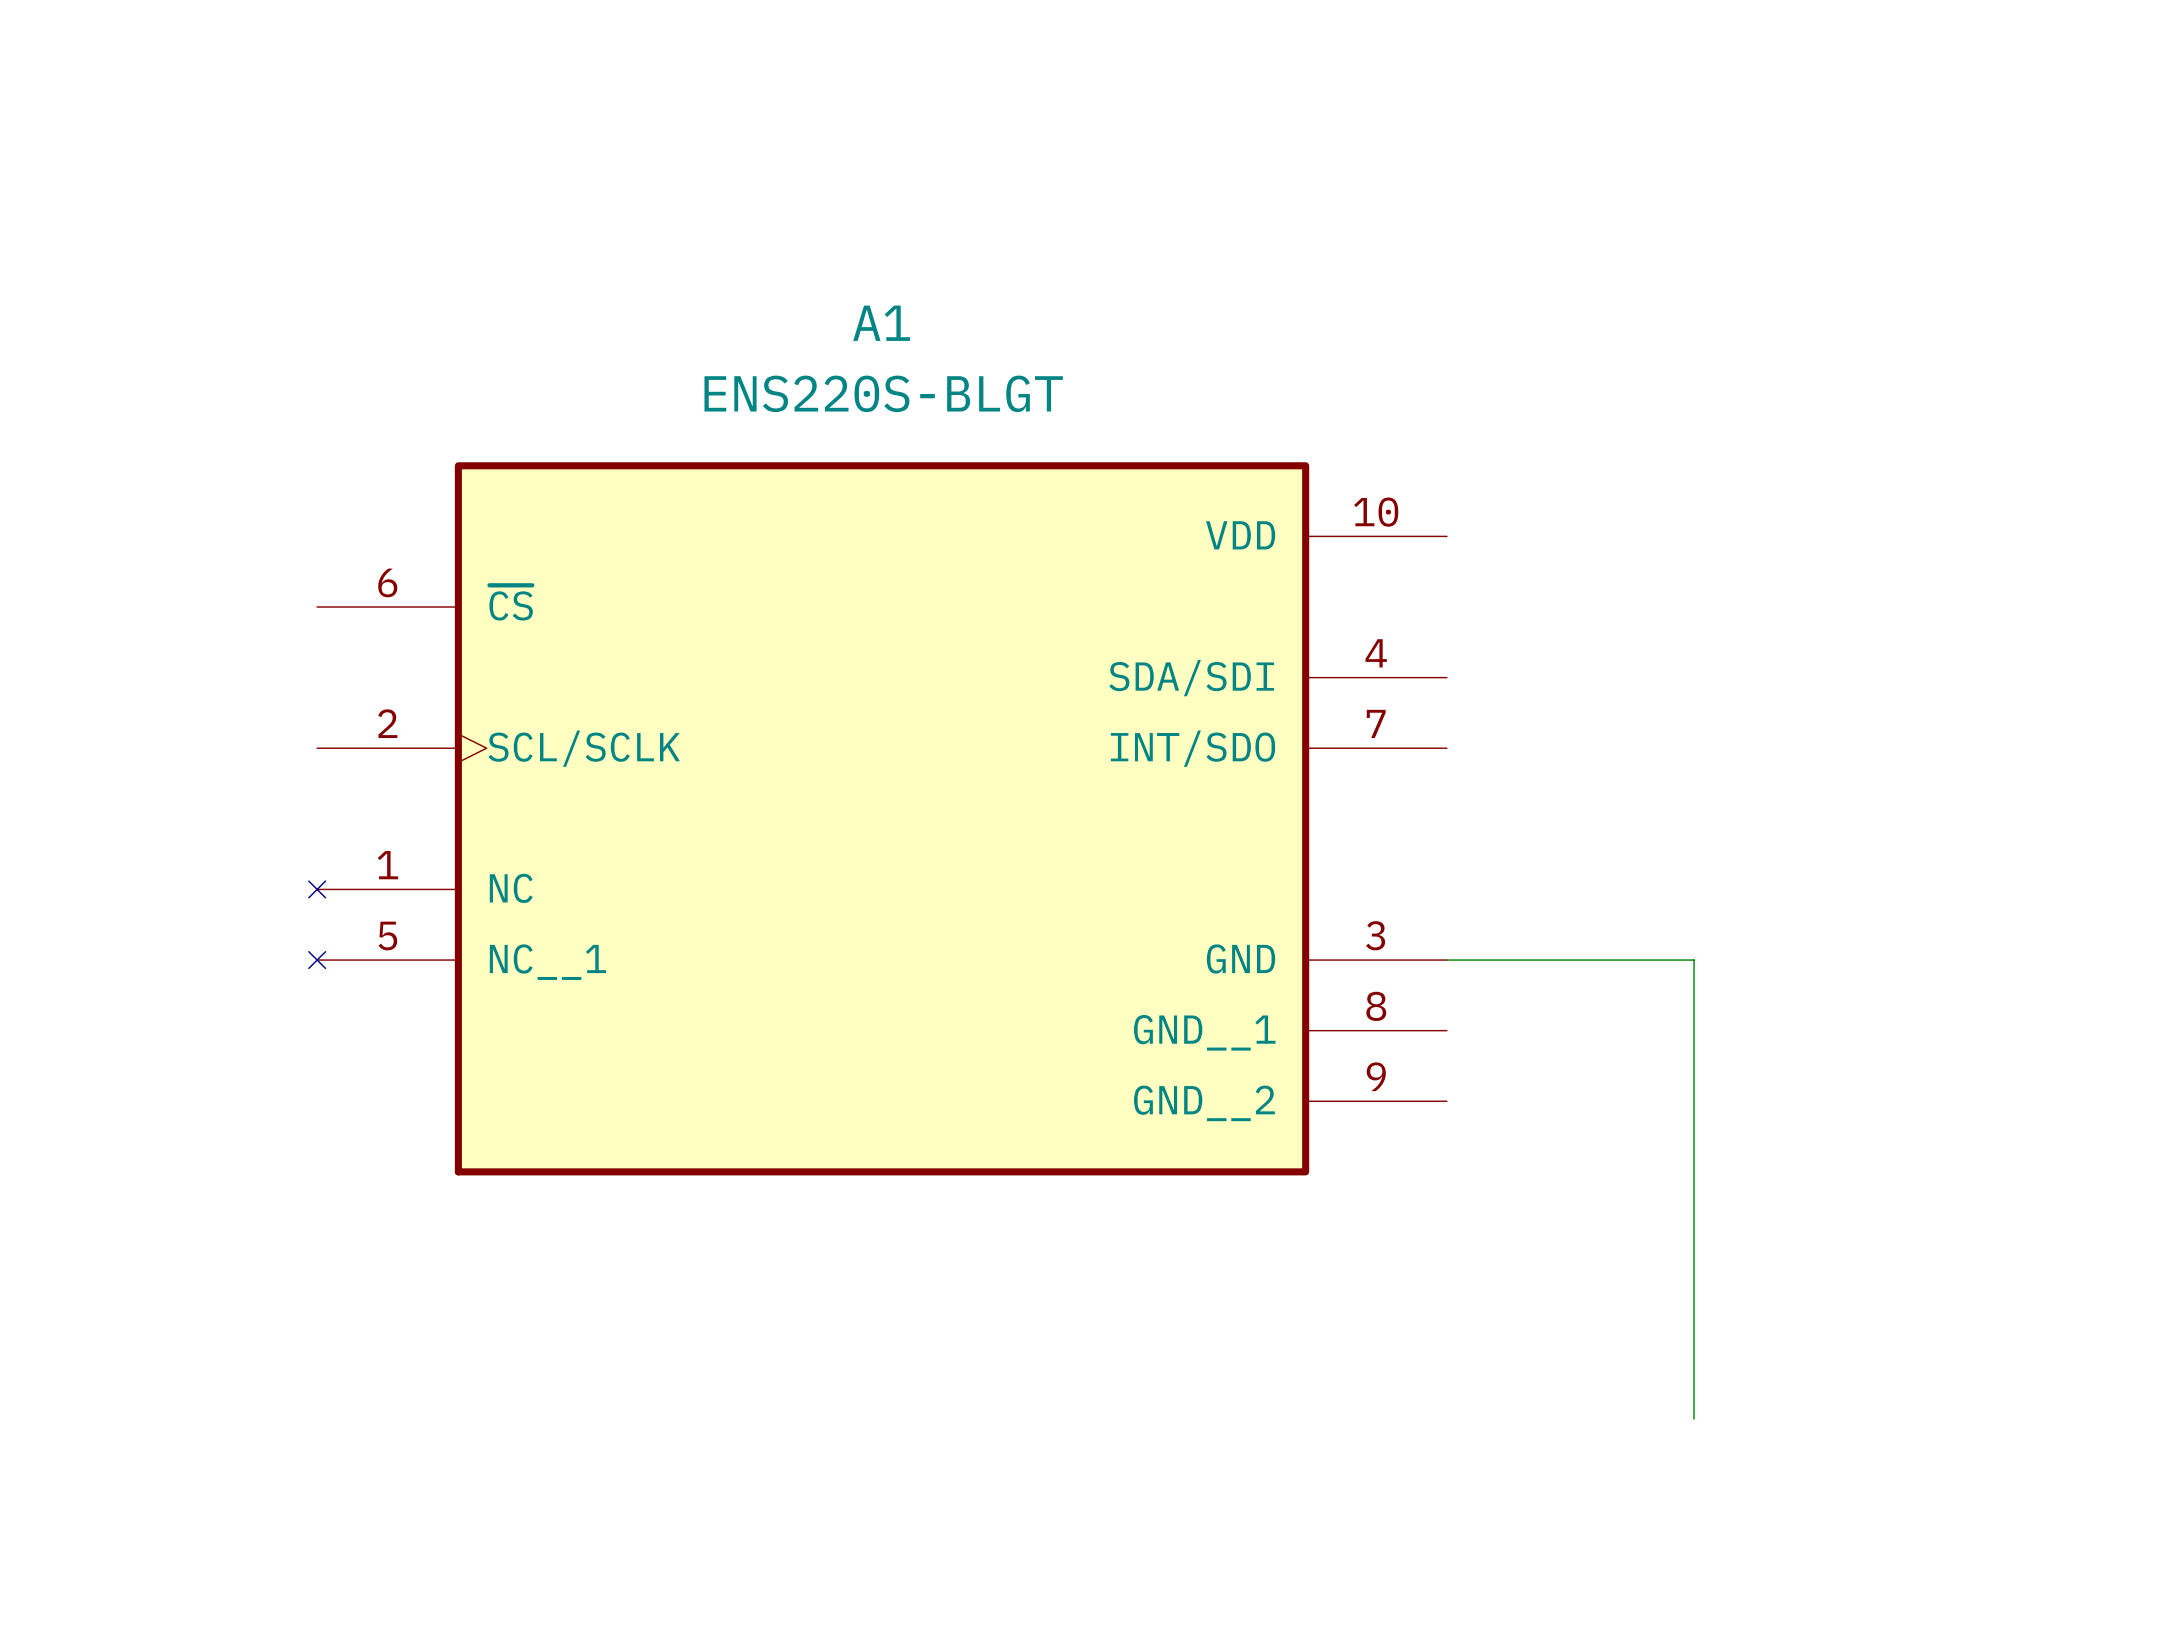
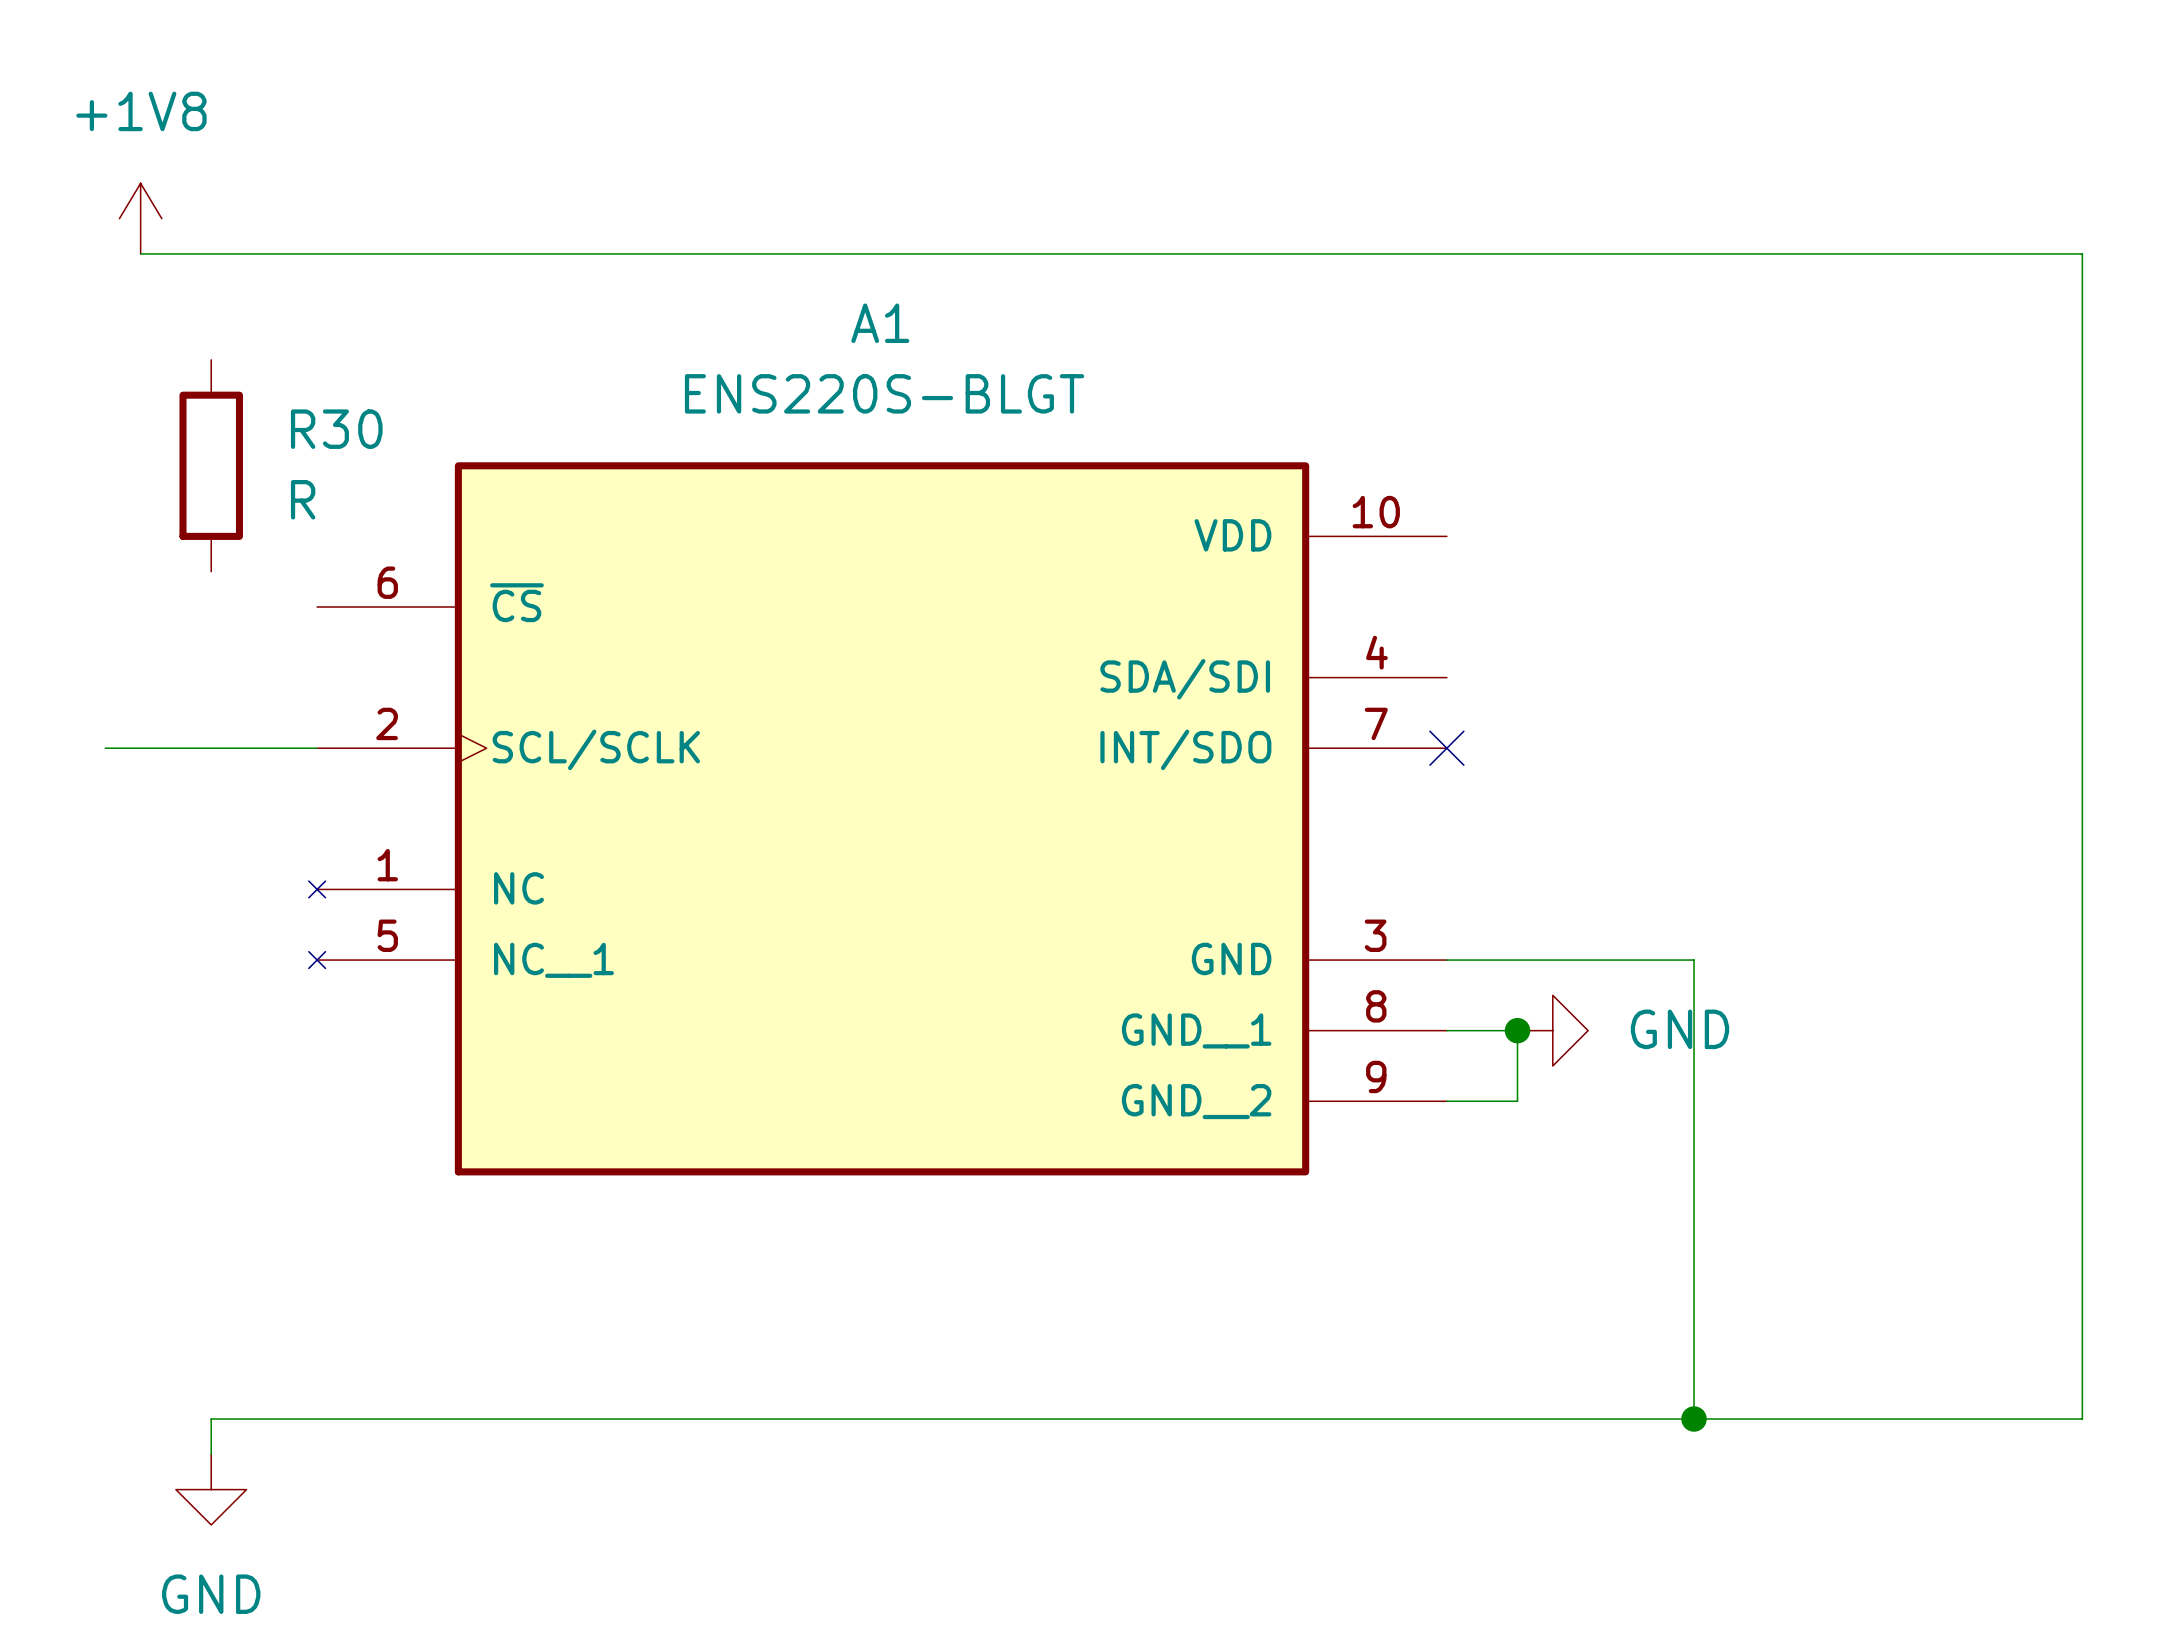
power symbol: none -> +1V8 (140, 218)
wire: none -> (140, 253) (2082, 253) (2082, 1419) (211, 1419) (211, 1454)
R30: none -> R (211, 465)
wire: none -> (105, 748) (317, 748)
no-connect mark: none -> (1446, 748)
wire: none -> (1446, 1030) (1517, 1030) (1517, 1101) (1446, 1101)
junction: none -> (1517, 1030)
power symbol: none -> GND (1552, 1030)
junction: none -> (1694, 1419)
power symbol: none -> GND (211, 1489)

